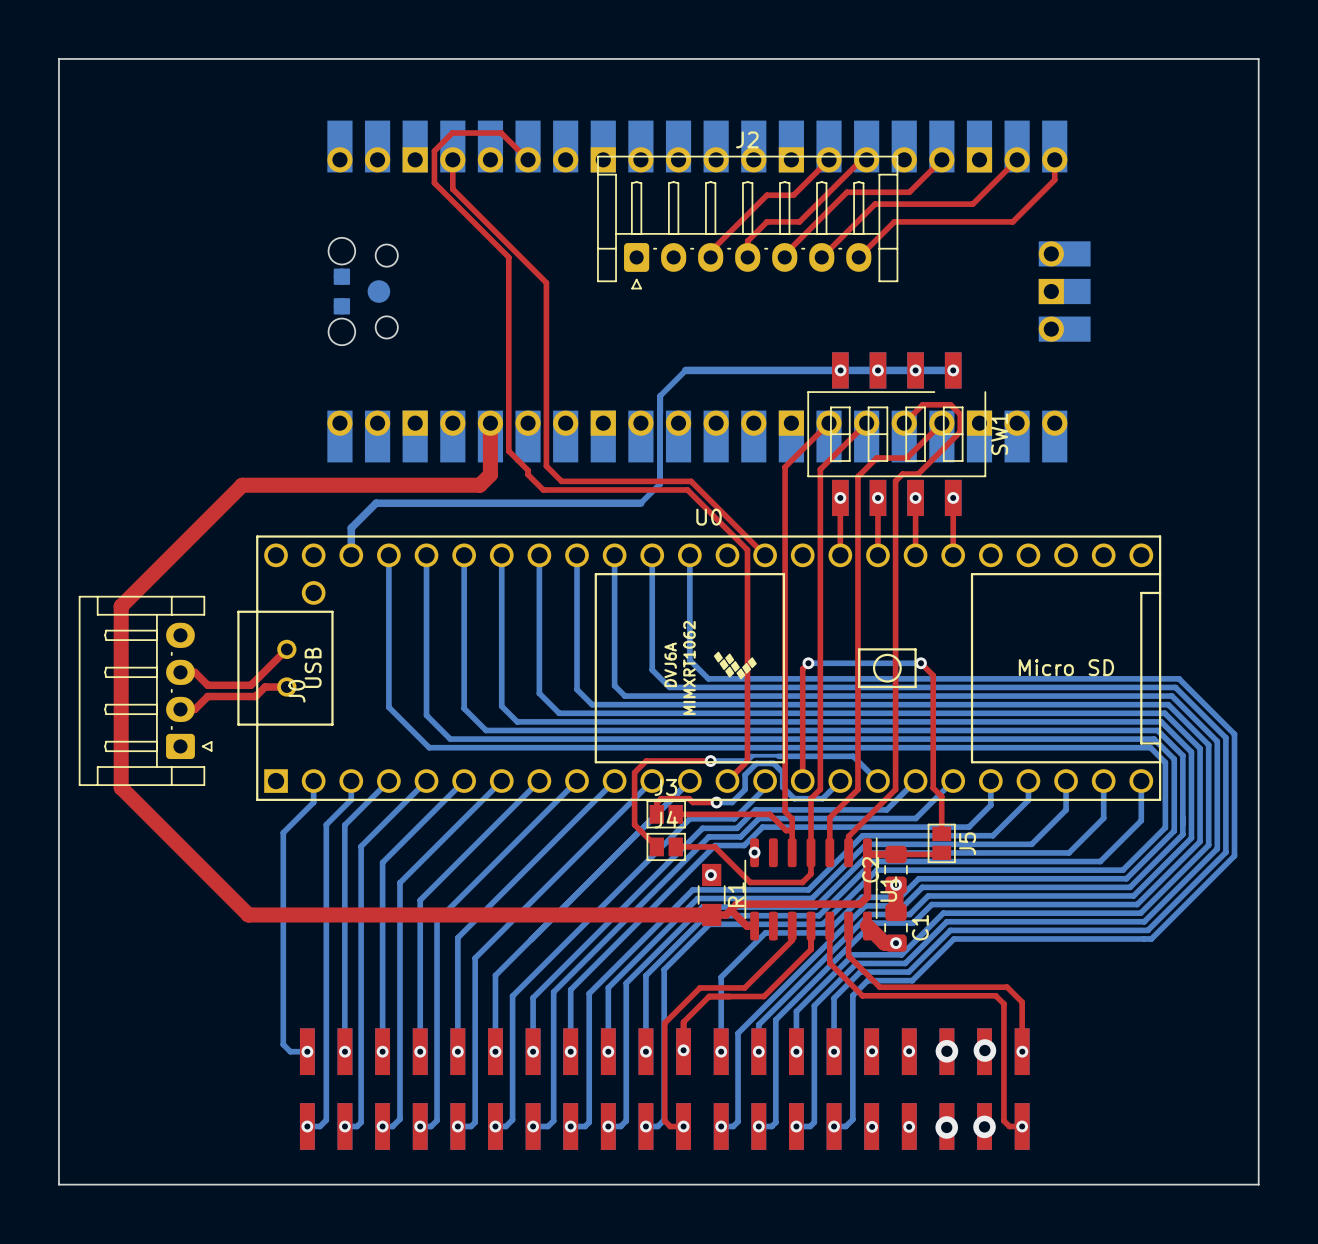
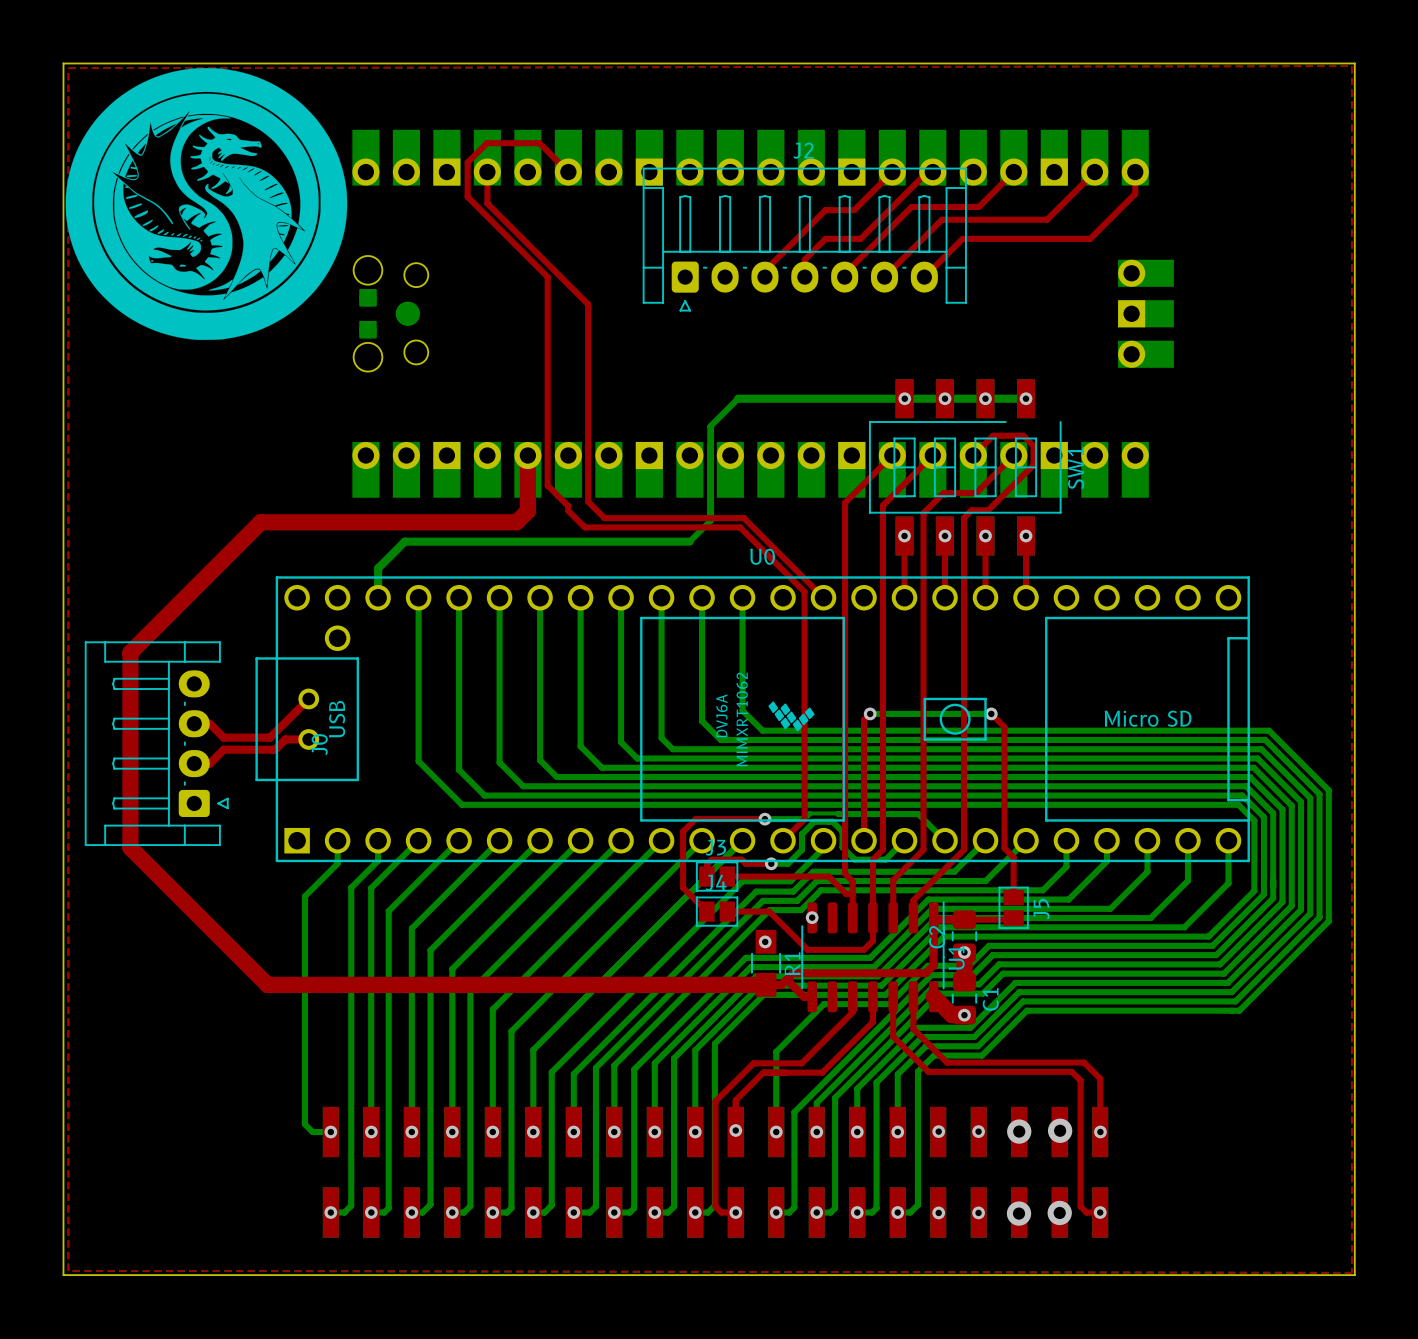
top zone outline: none -> (1352, 66) (68, 68) (68, 1270) (1352, 1272) (1352, 66)
drawing: none -> [65, 68, 348, 340]

